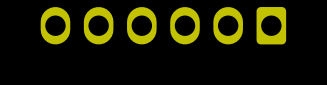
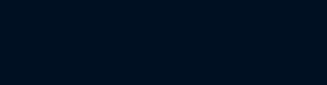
part: (163, 25) -> none

